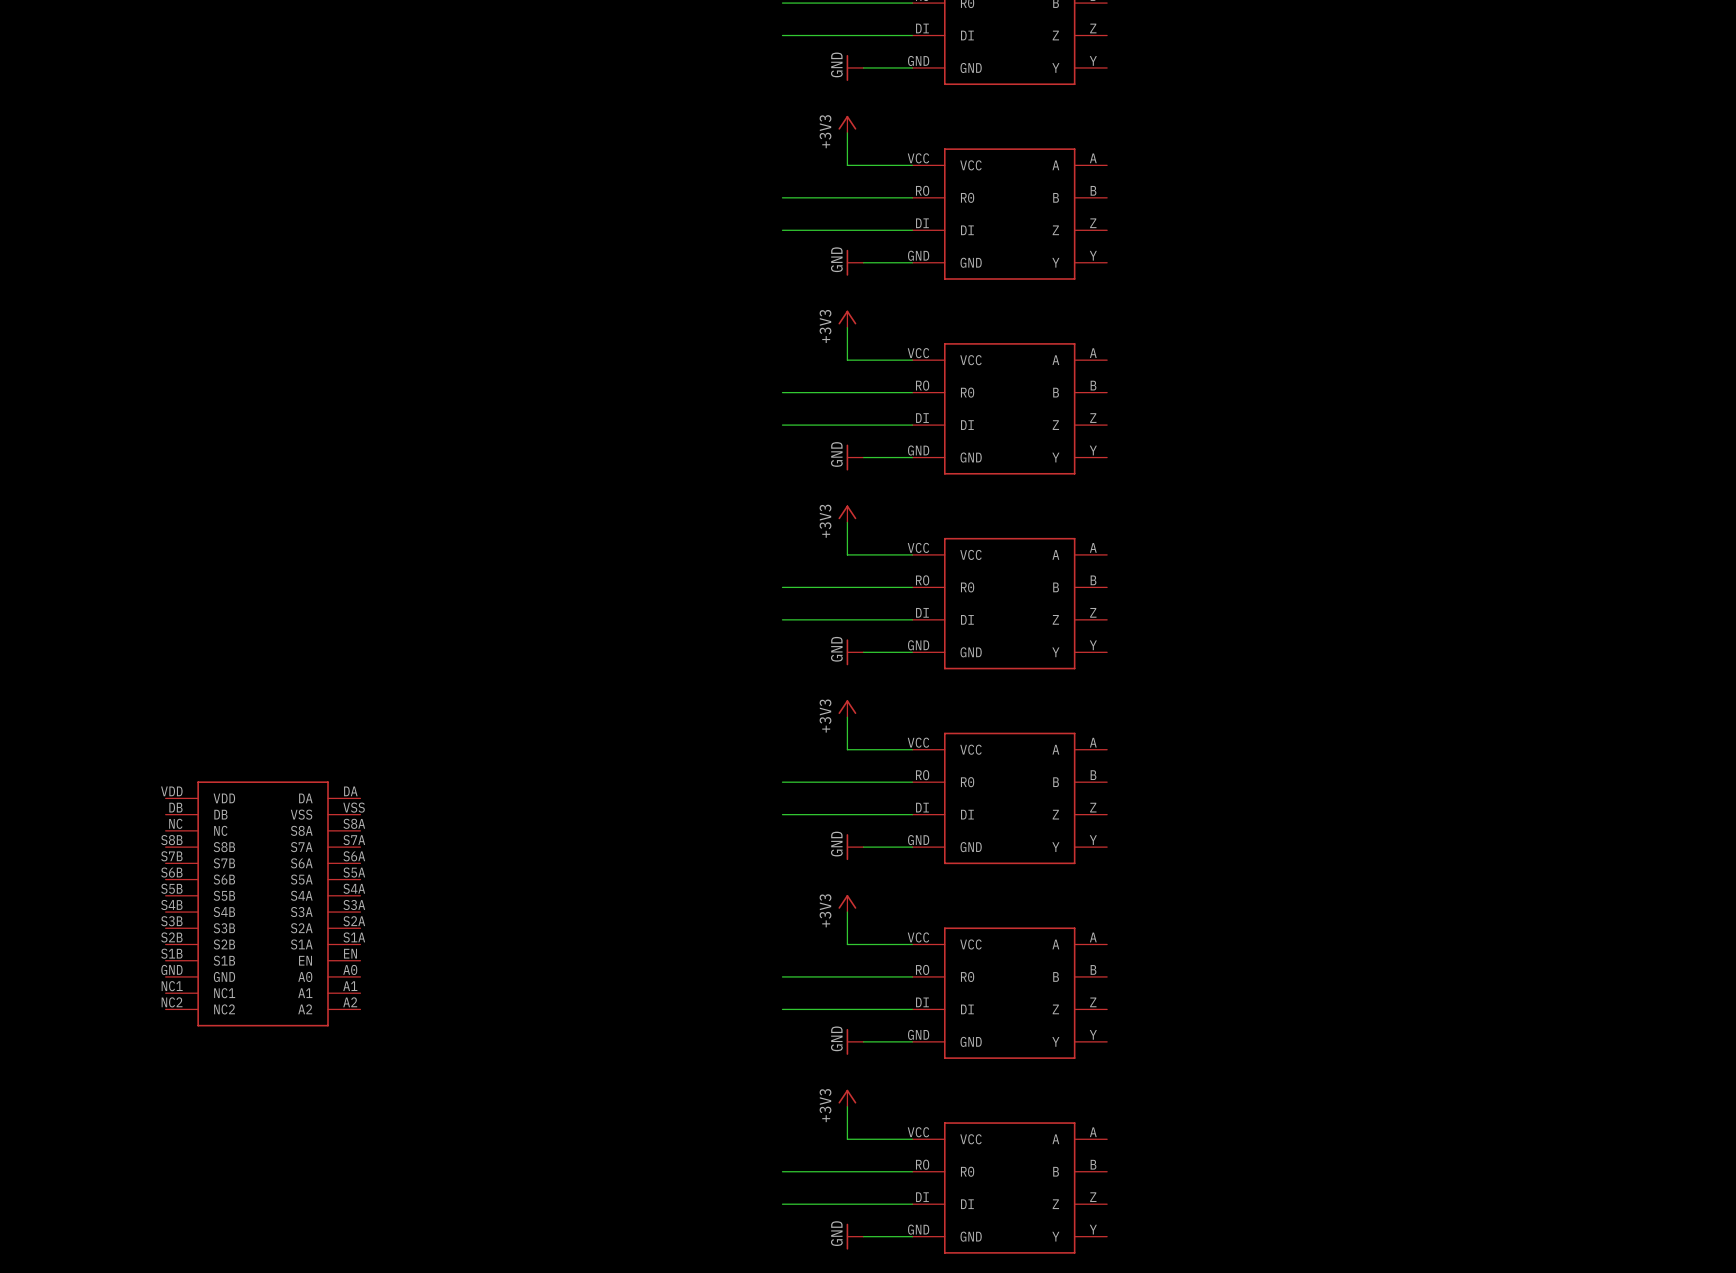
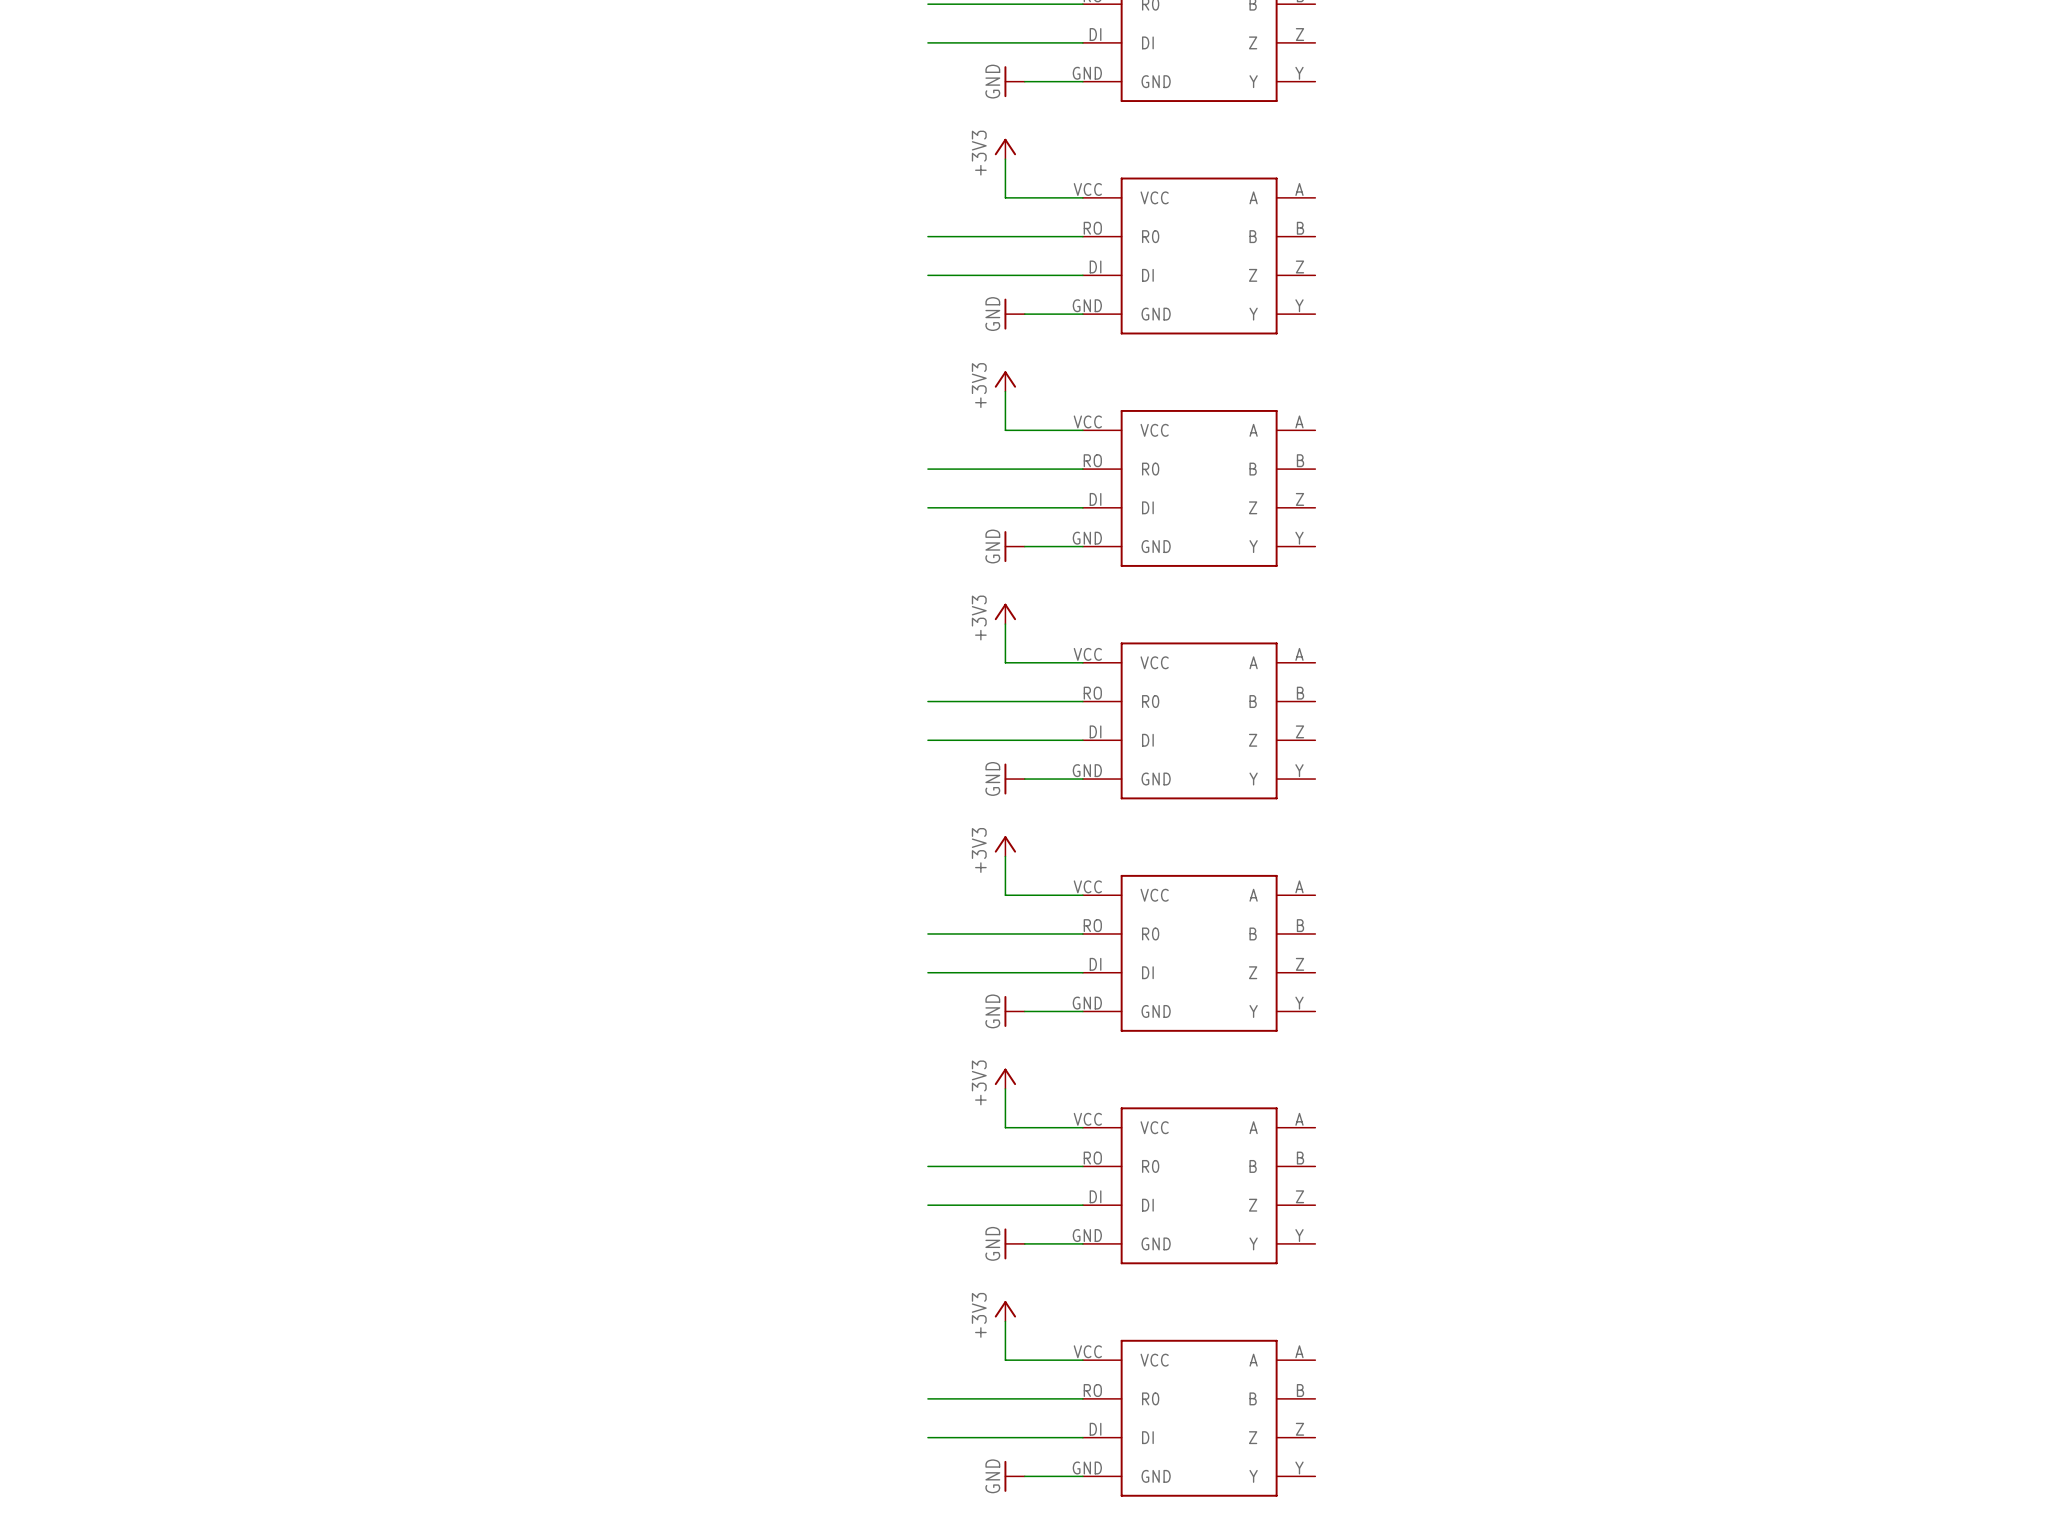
part: (263, 903) -> none

